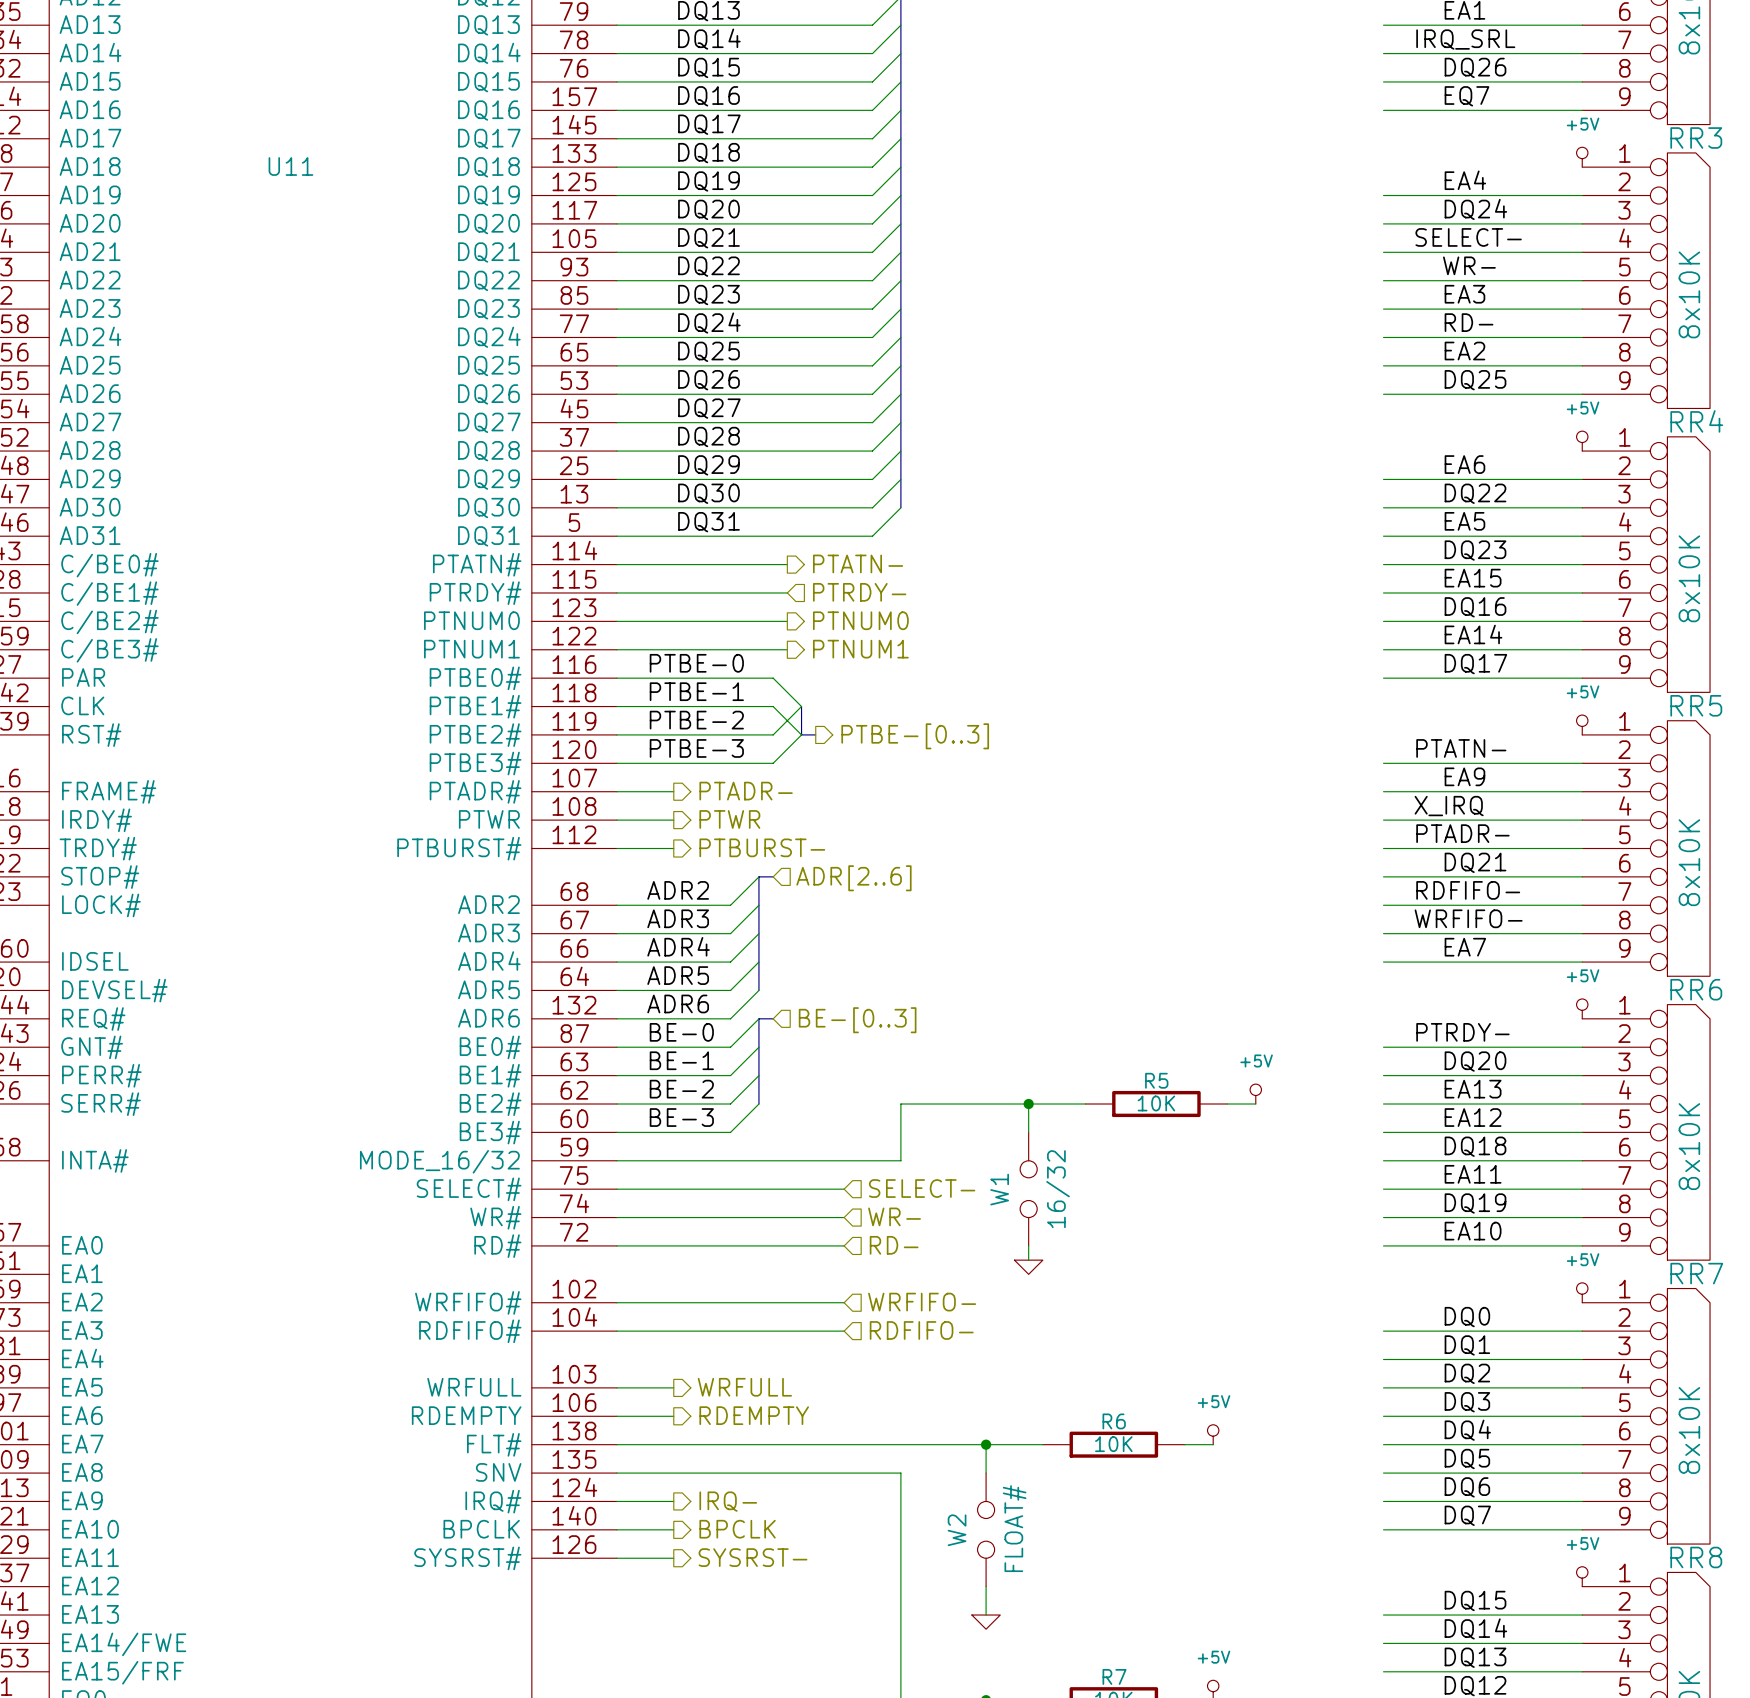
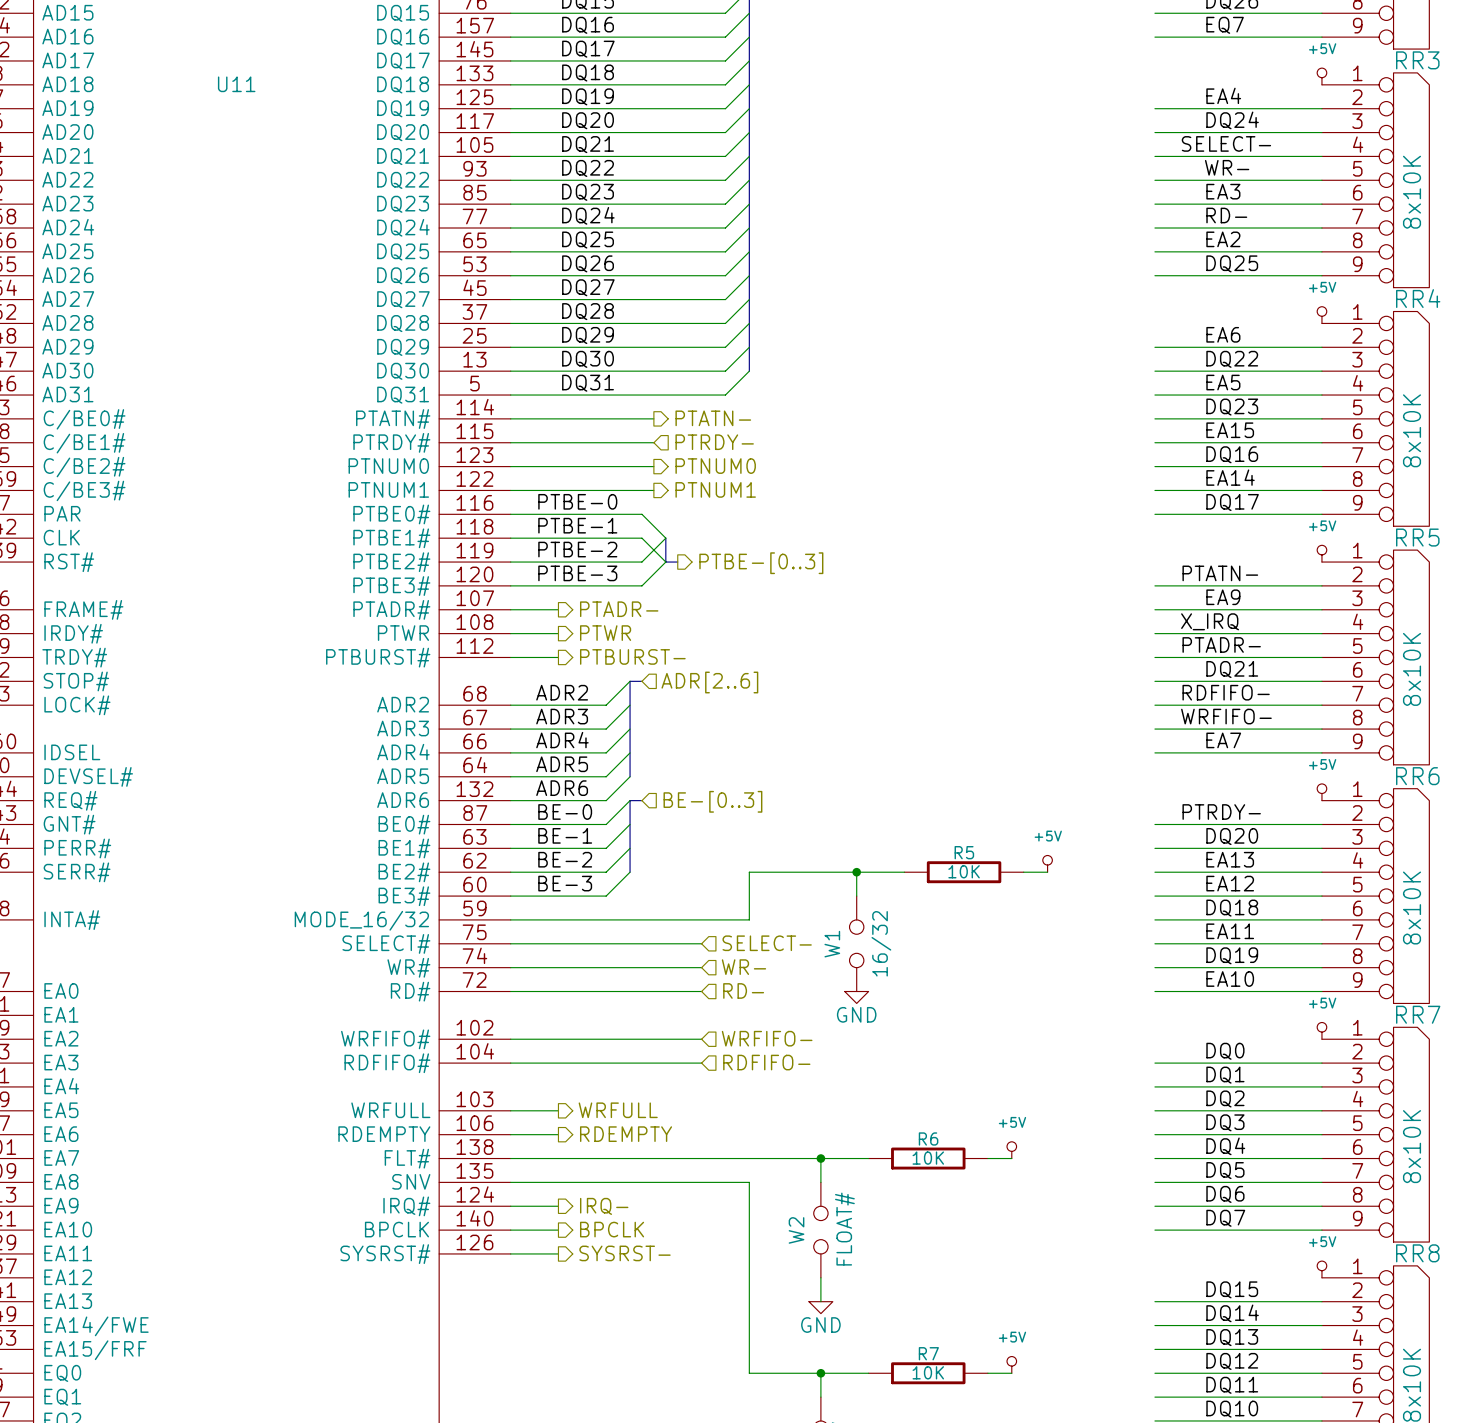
wire: (1028, 1245) (1028, 1260) -> none
power symbol: none -> GND (856, 997)
power symbol: (1028, 1267) -> none
power symbol text: none -> GND (820, 1325)

